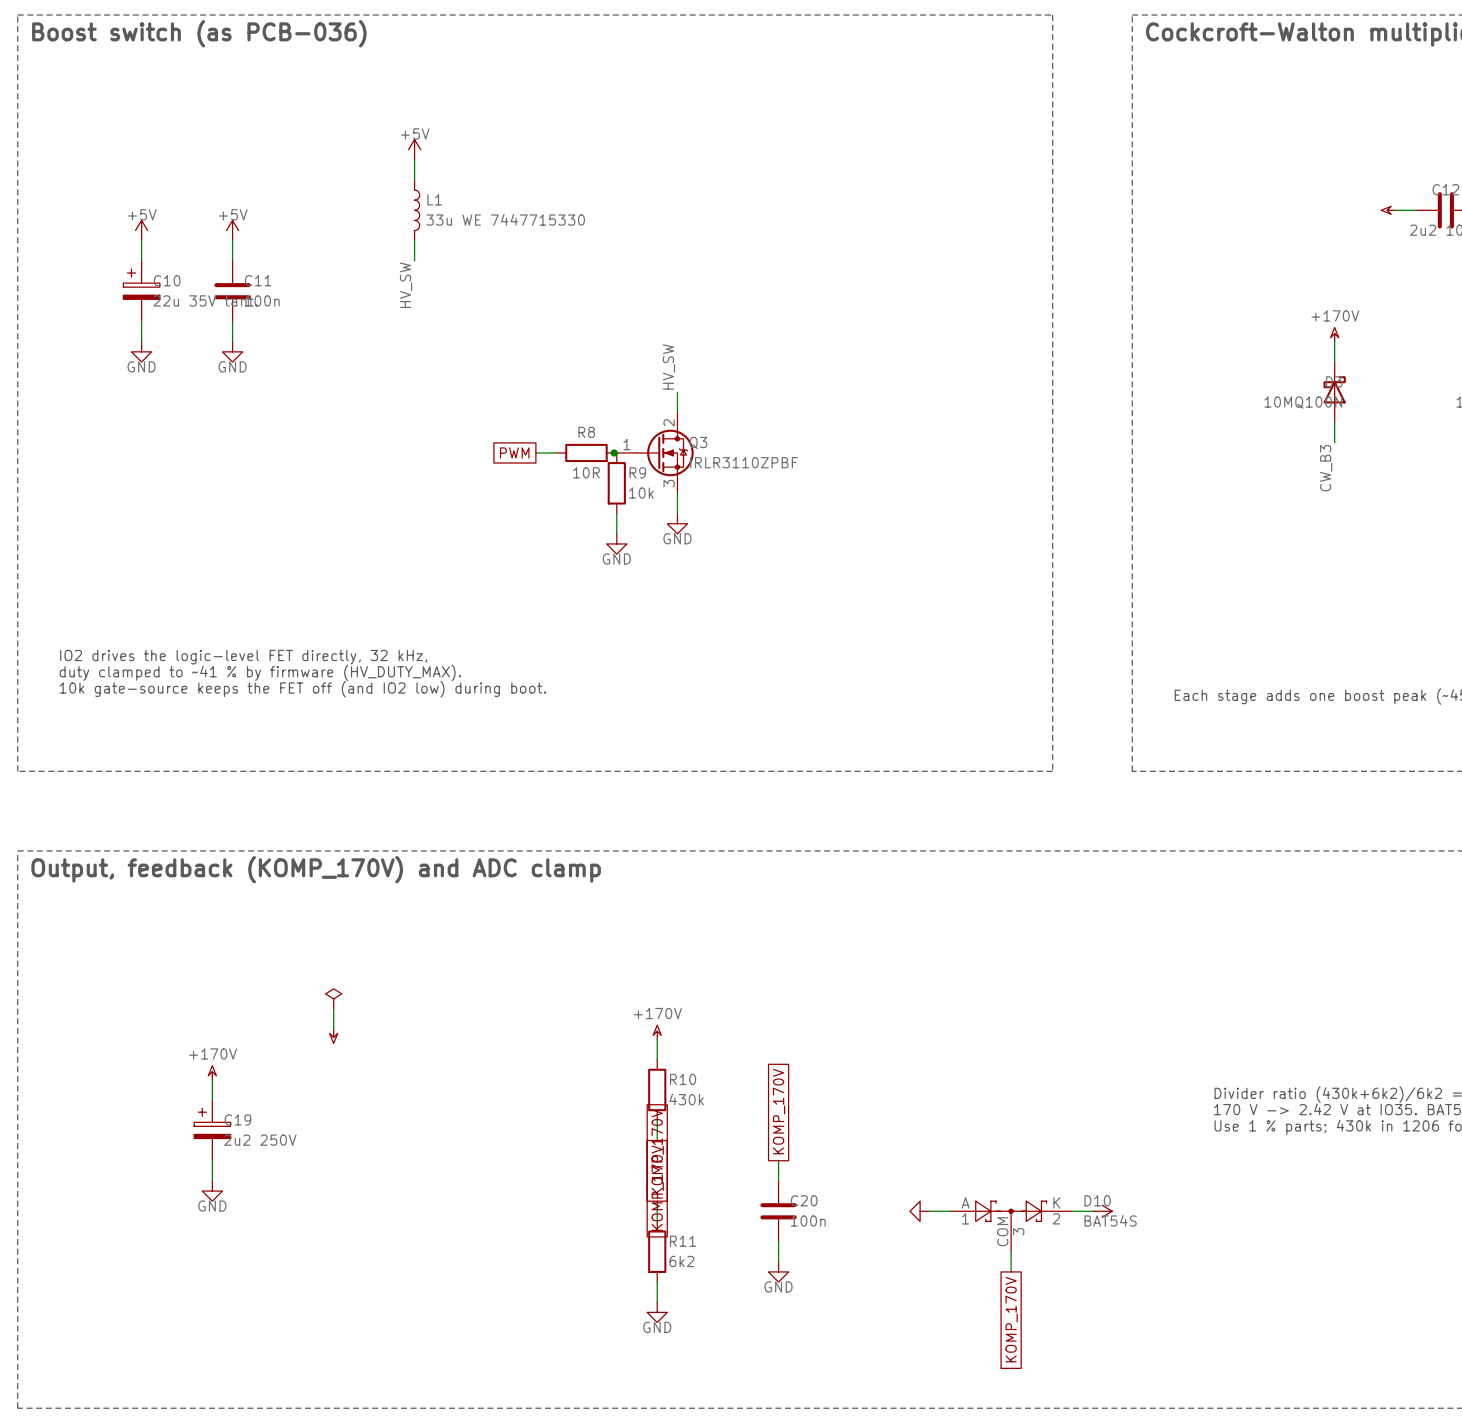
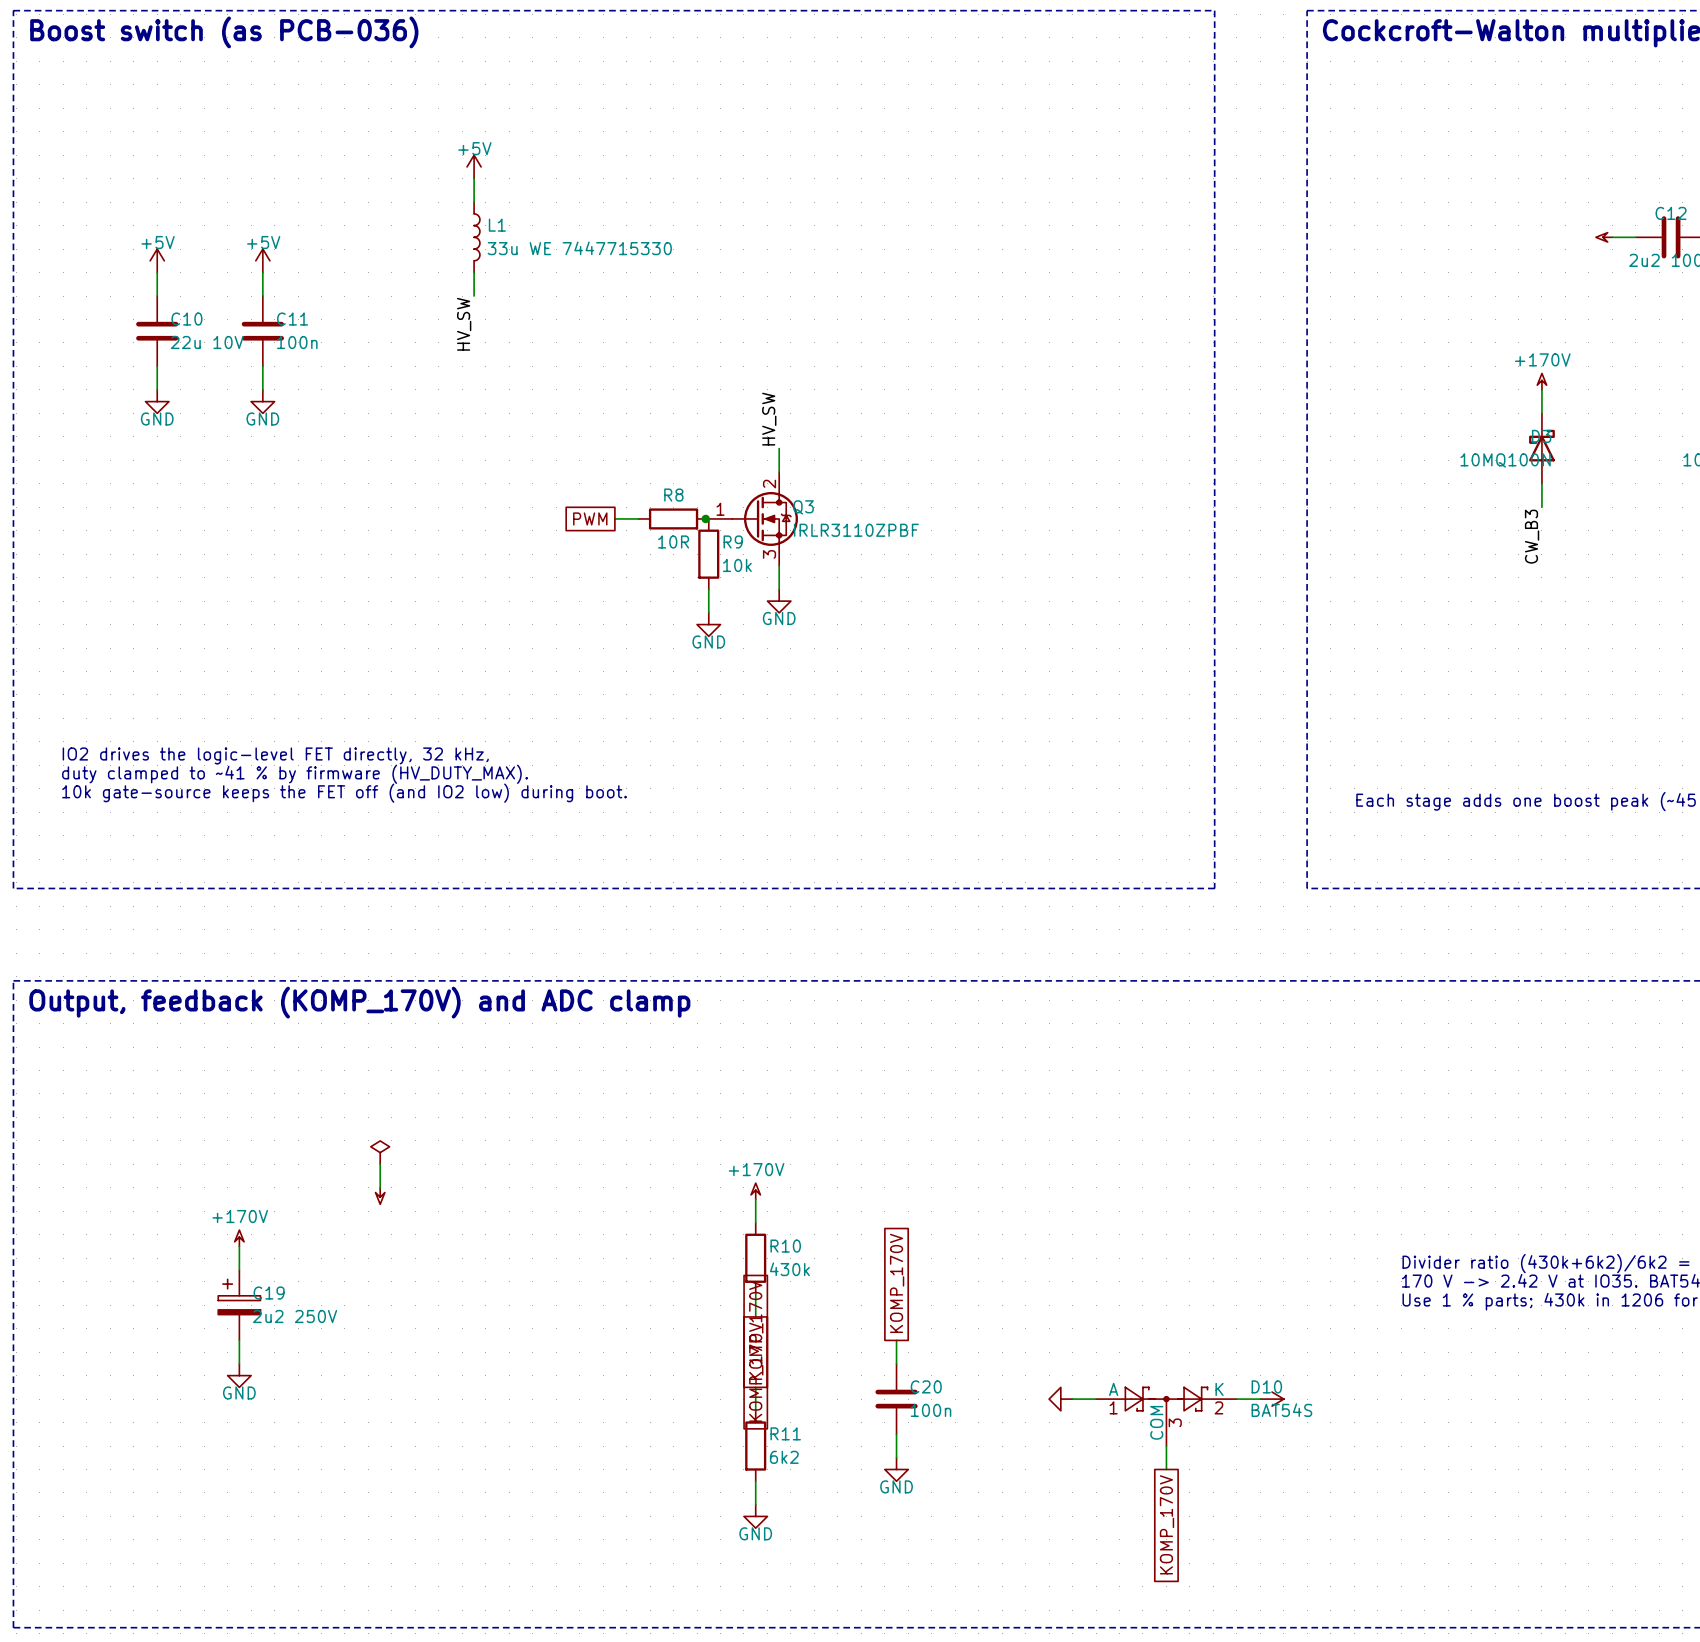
C10 symbol: [123, 260, 160, 322] -> [136, 296, 179, 367]
C10 value: 22u 35V tant. (205, 300) -> 22u 10V (207, 342)

